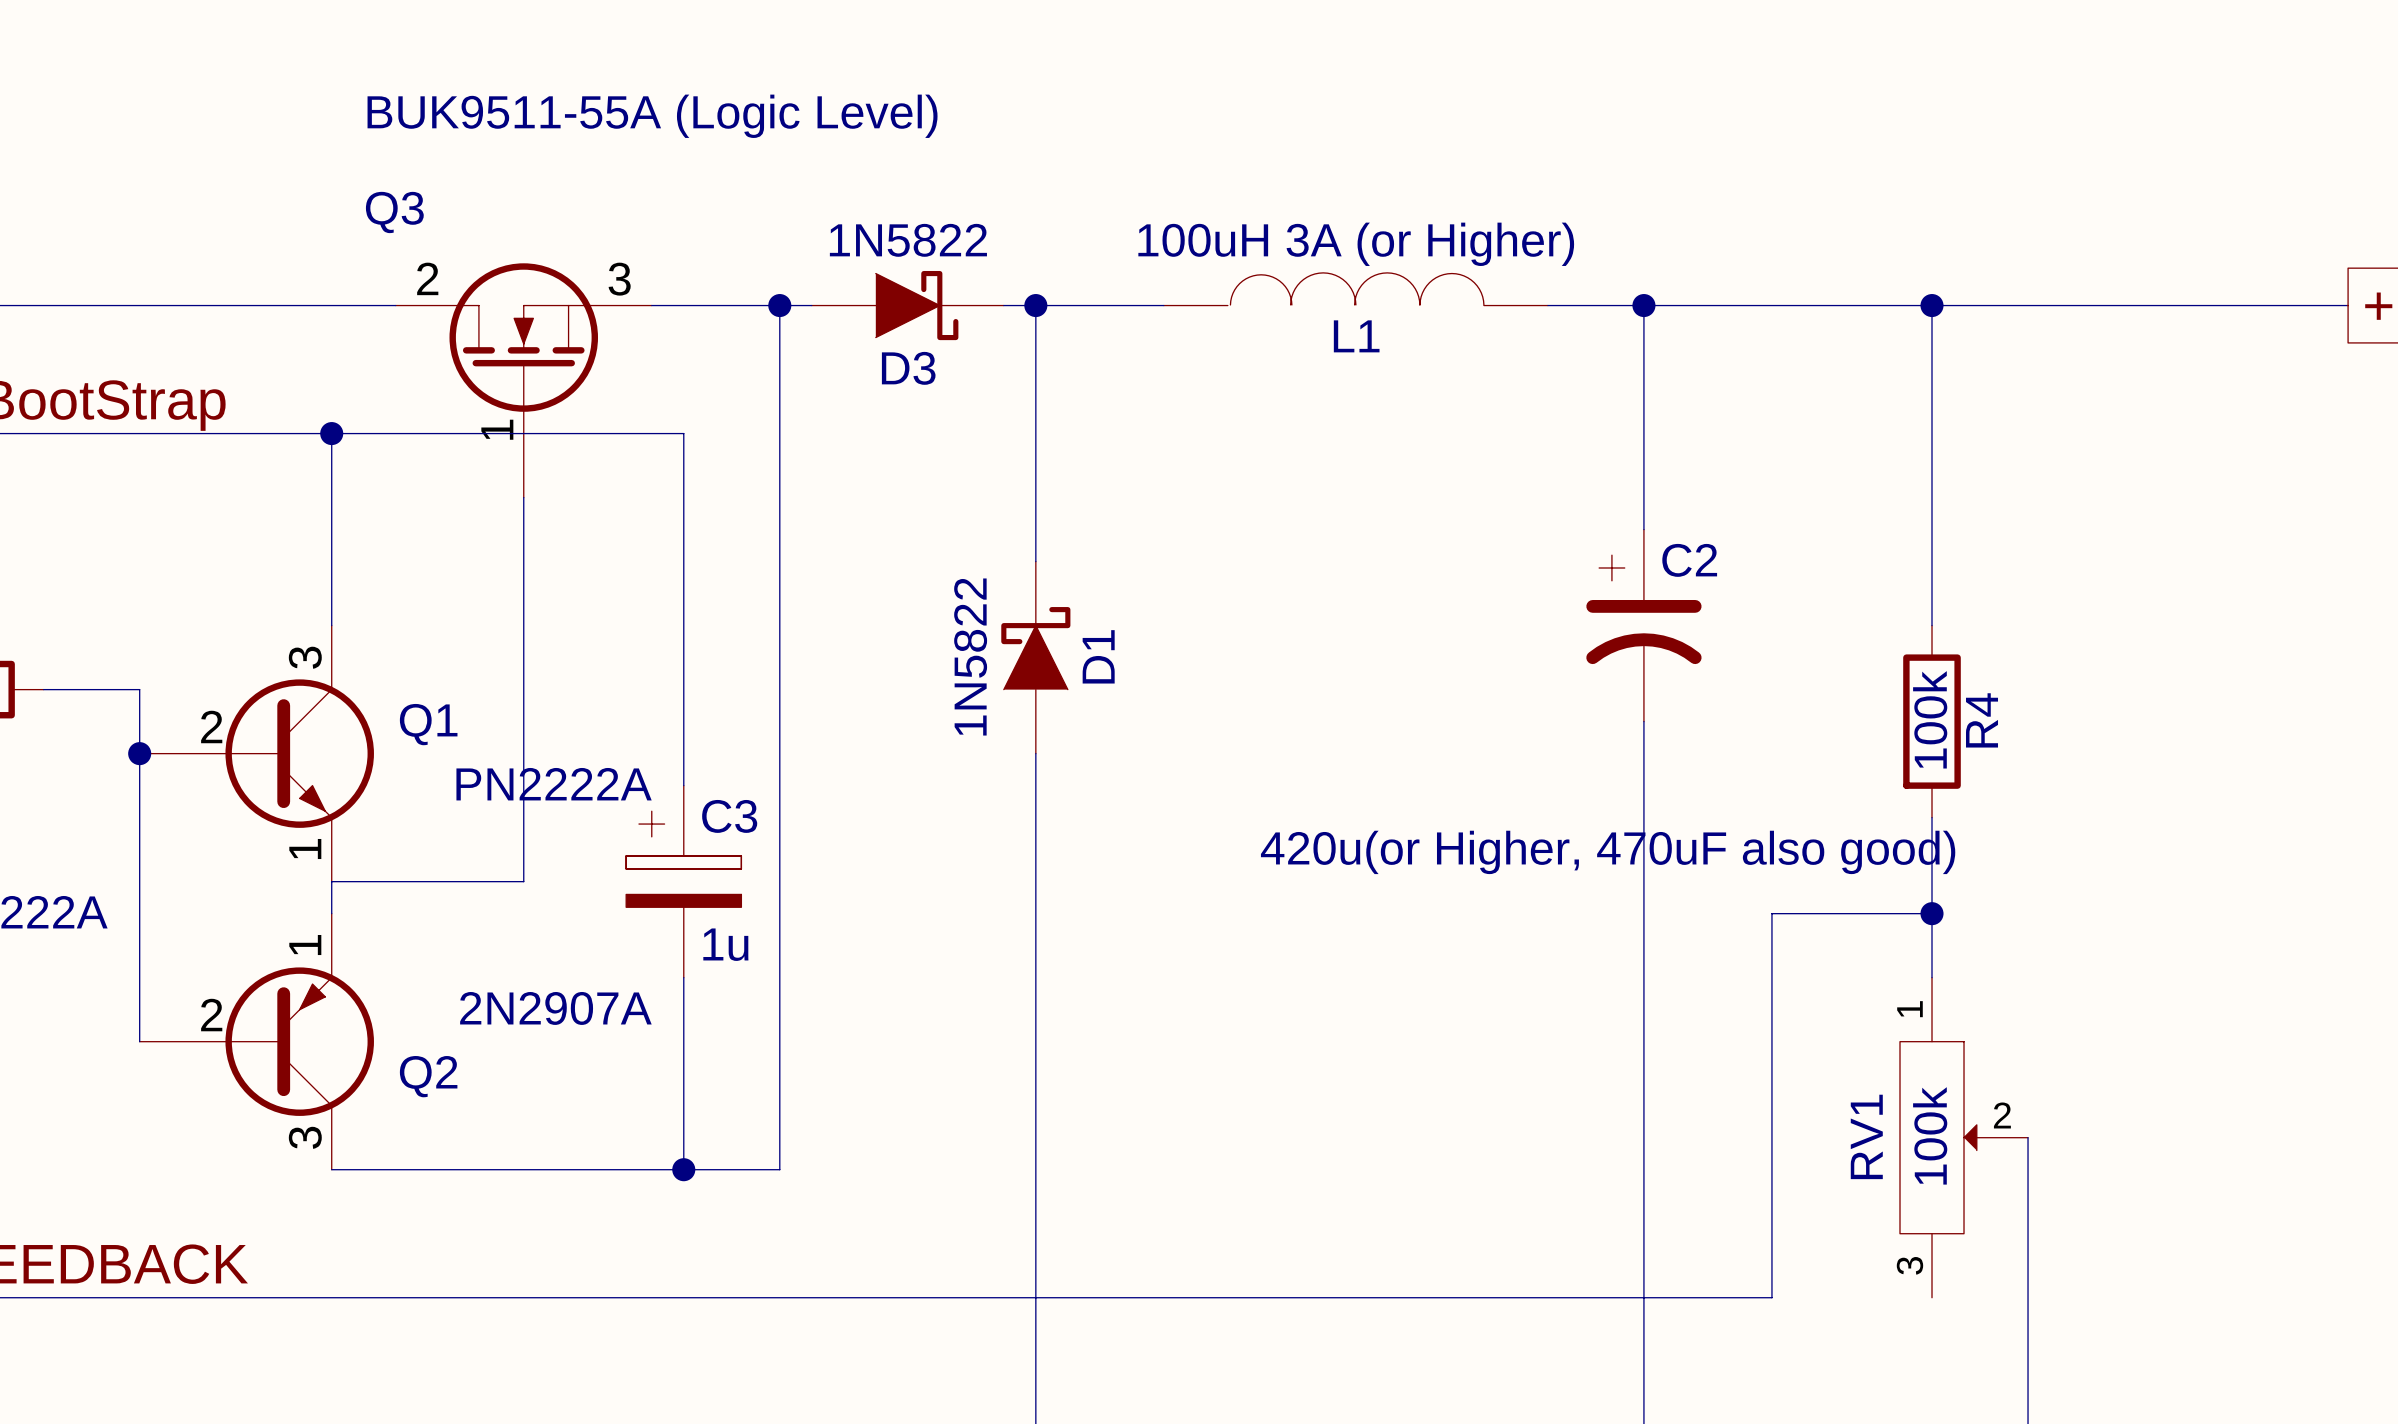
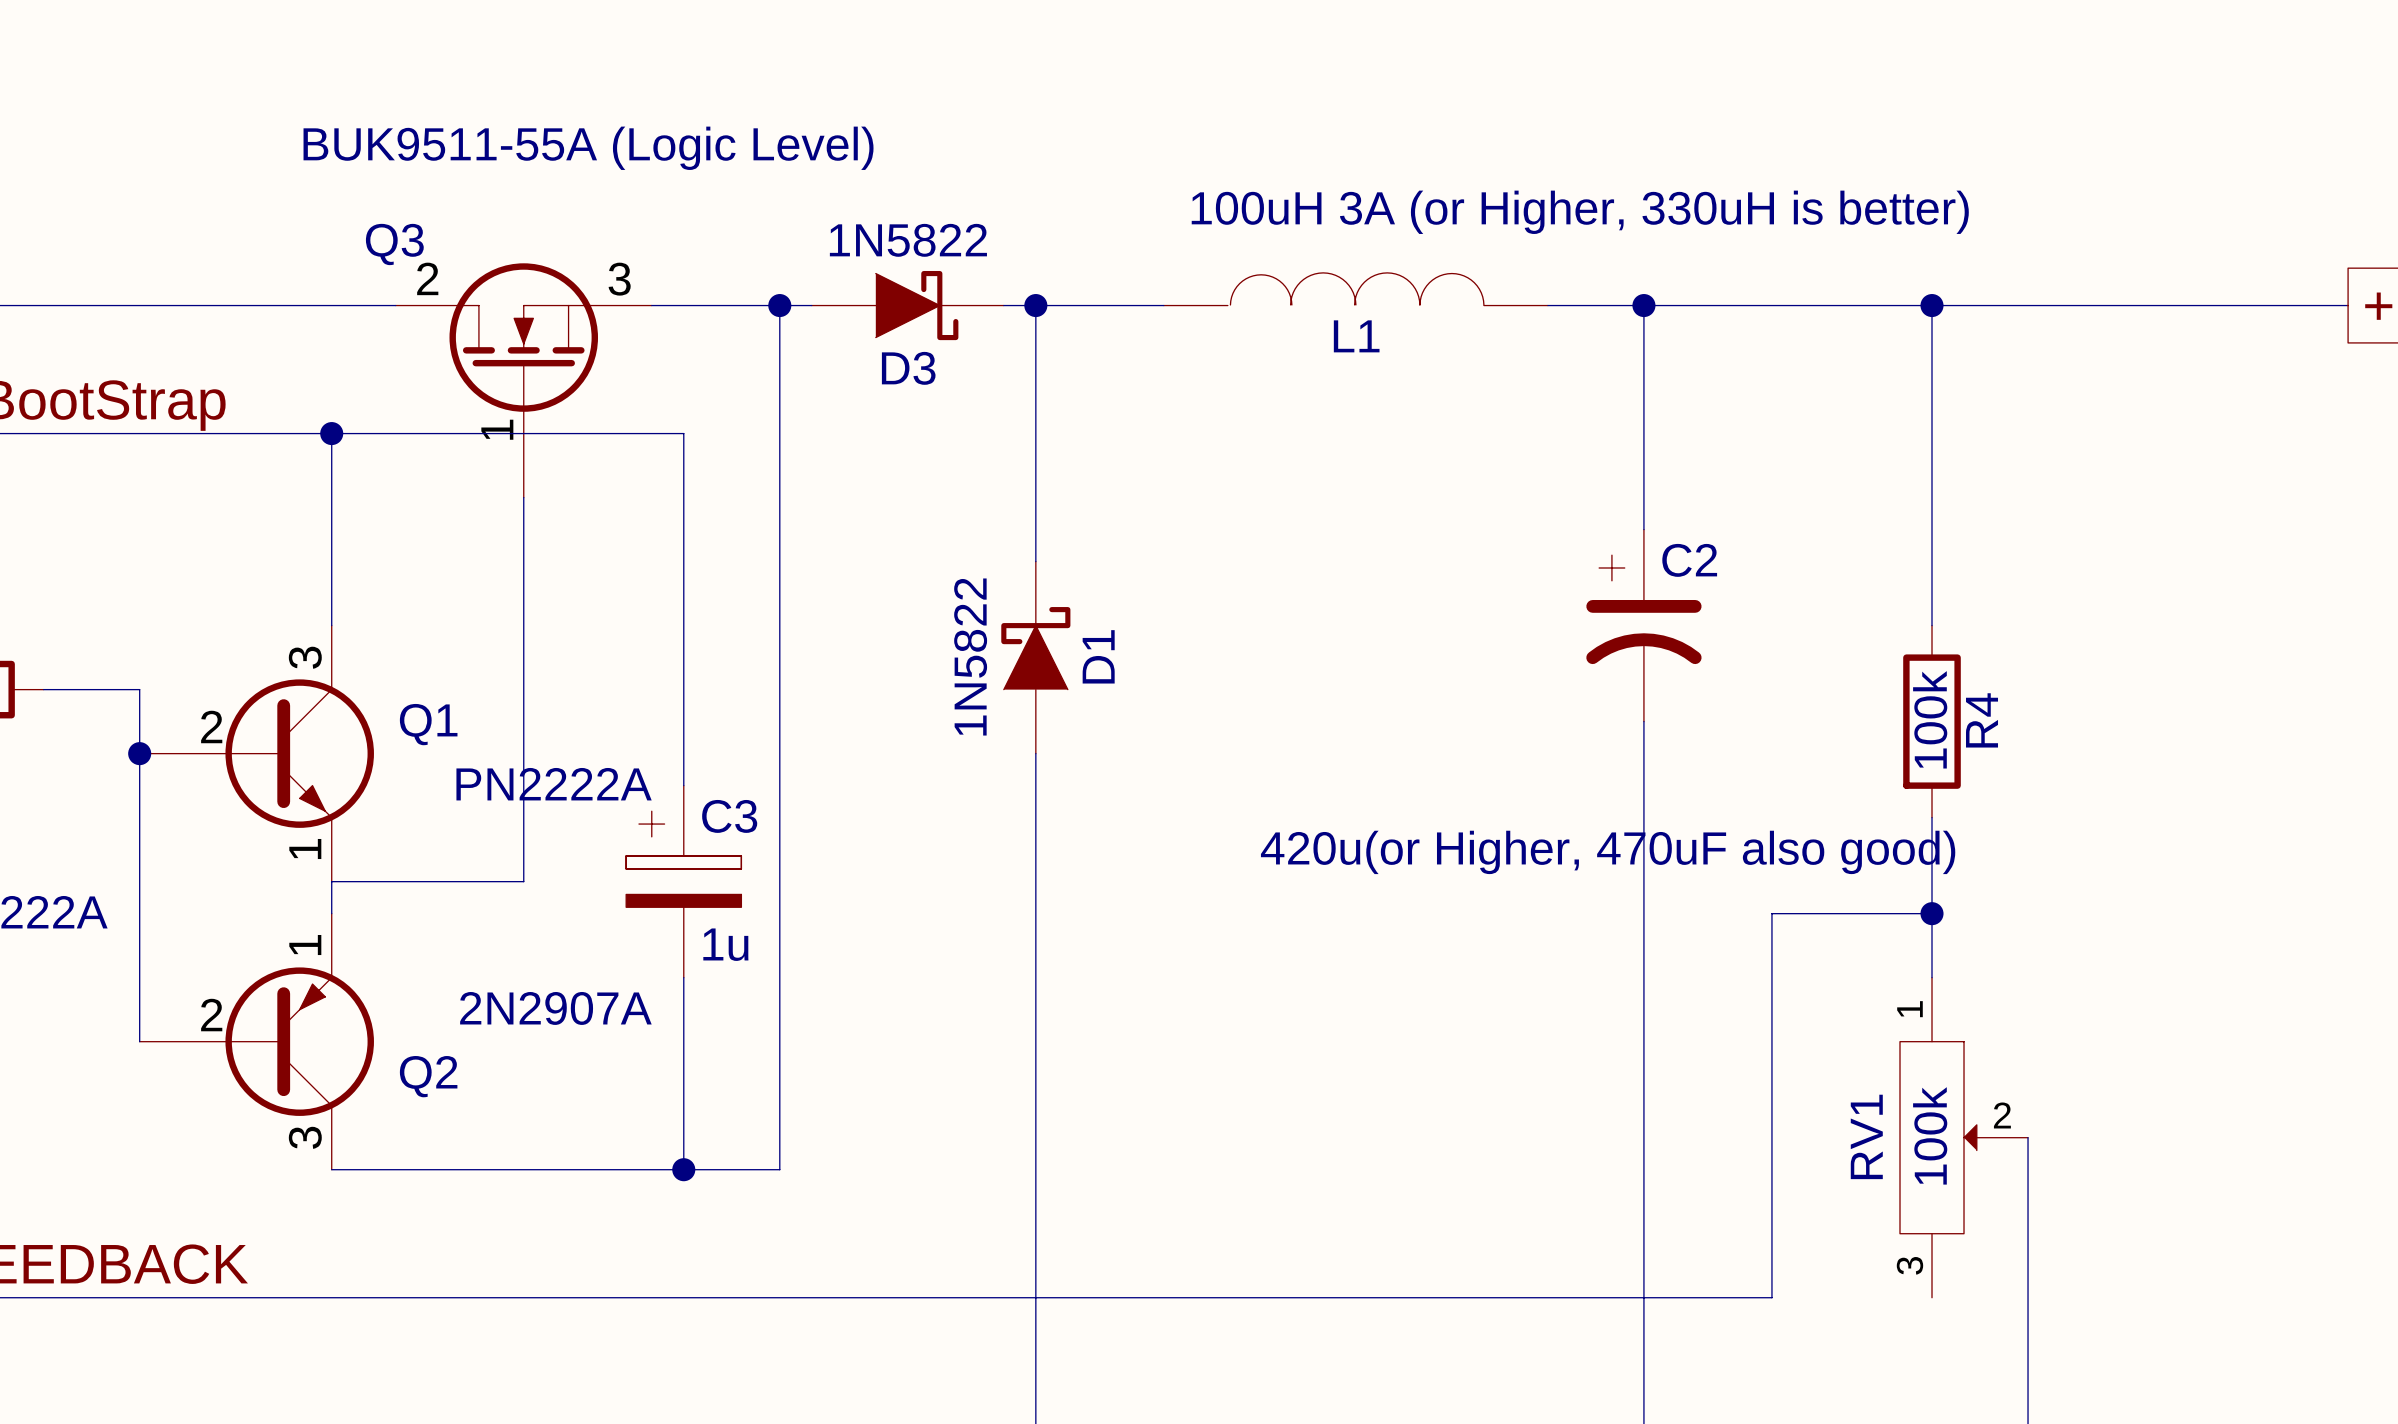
Q3 value position: BUK9511-55A (Logic Level) (652, 116) -> BUK9511-55A (Logic Level) (588, 148)
Q3 name position: Q3 (394, 212) -> Q3 (394, 244)
L1 value: 100uH 3A (or Higher) (1356, 244) -> 100uH 3A (or Higher, 330uH is better) (1580, 212)

